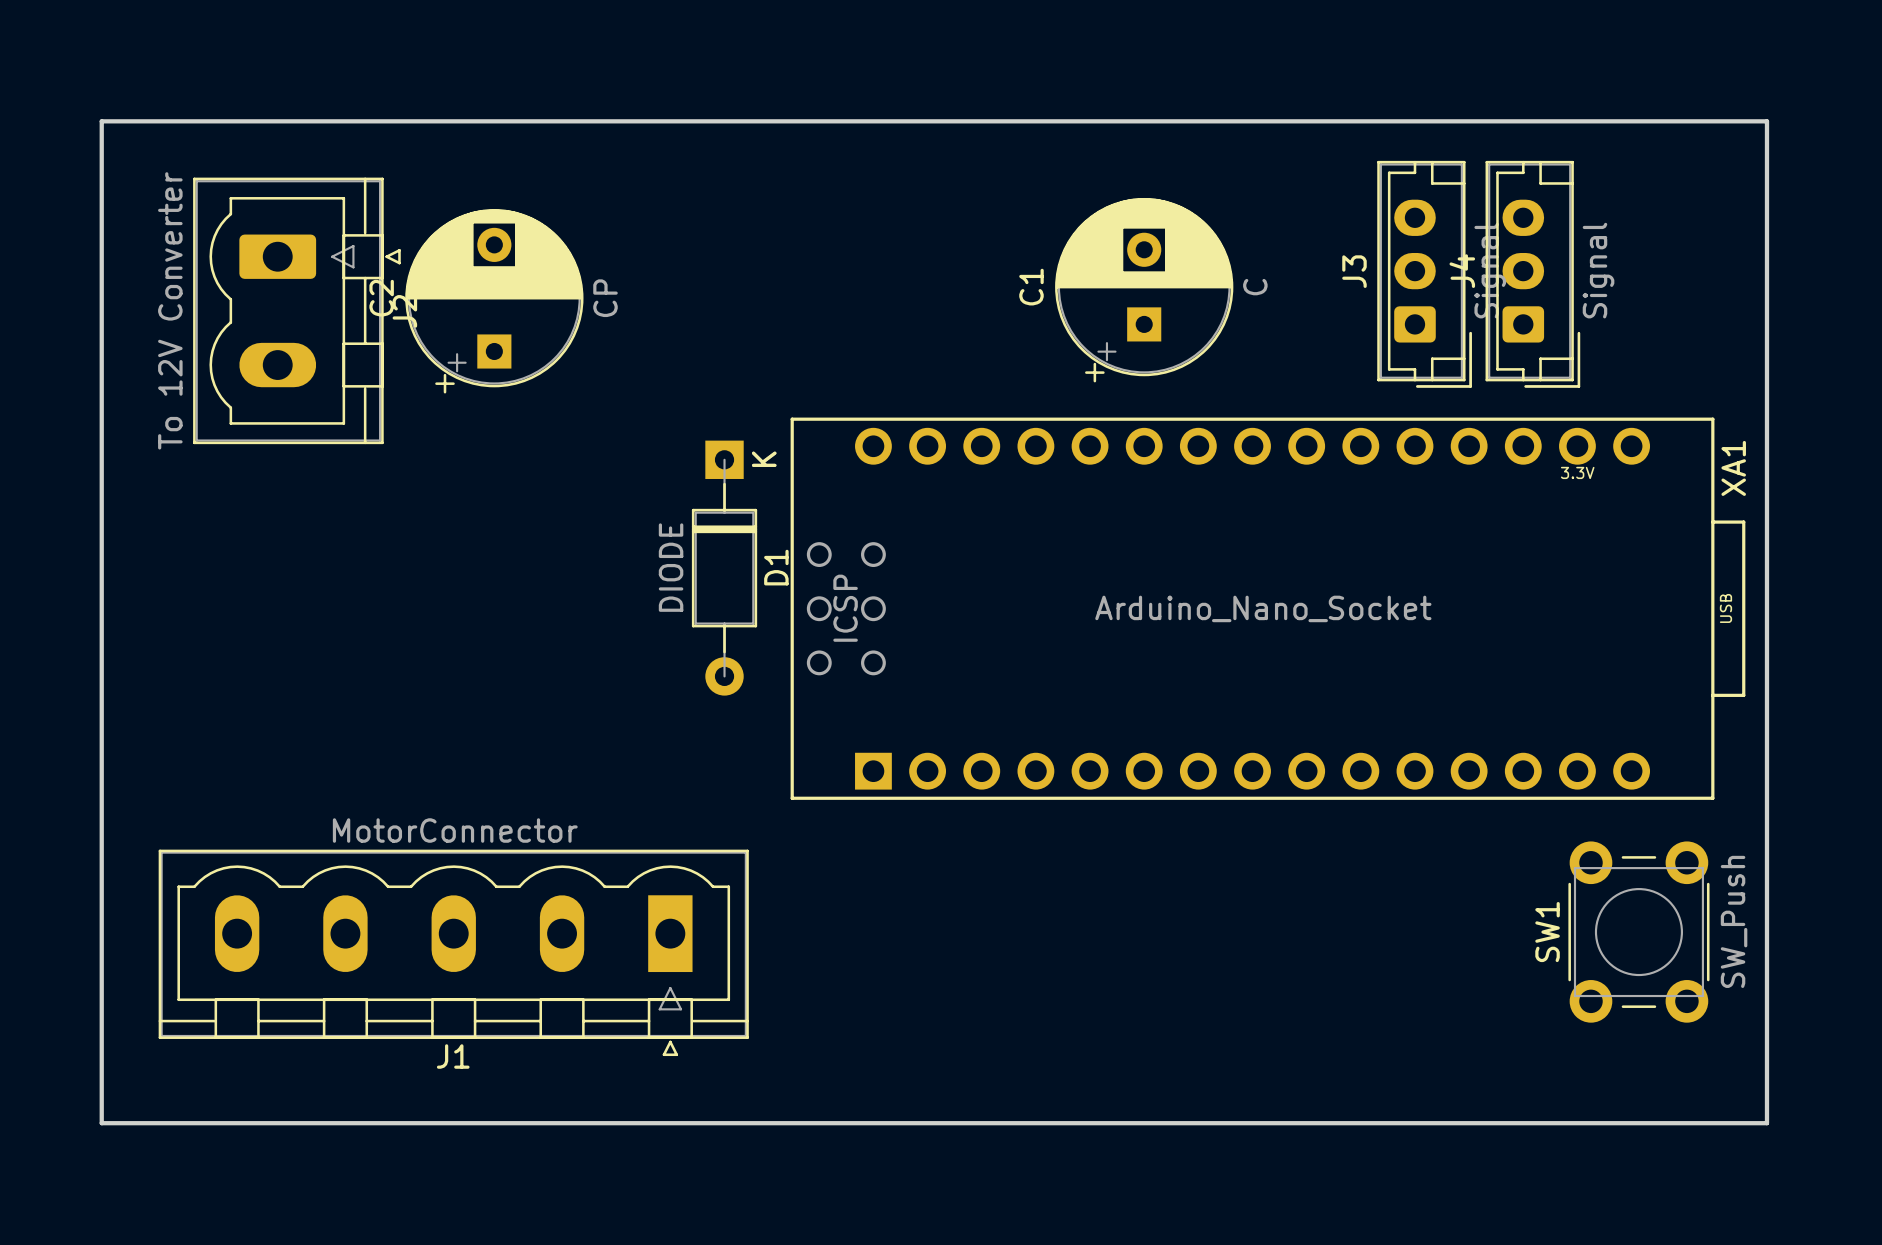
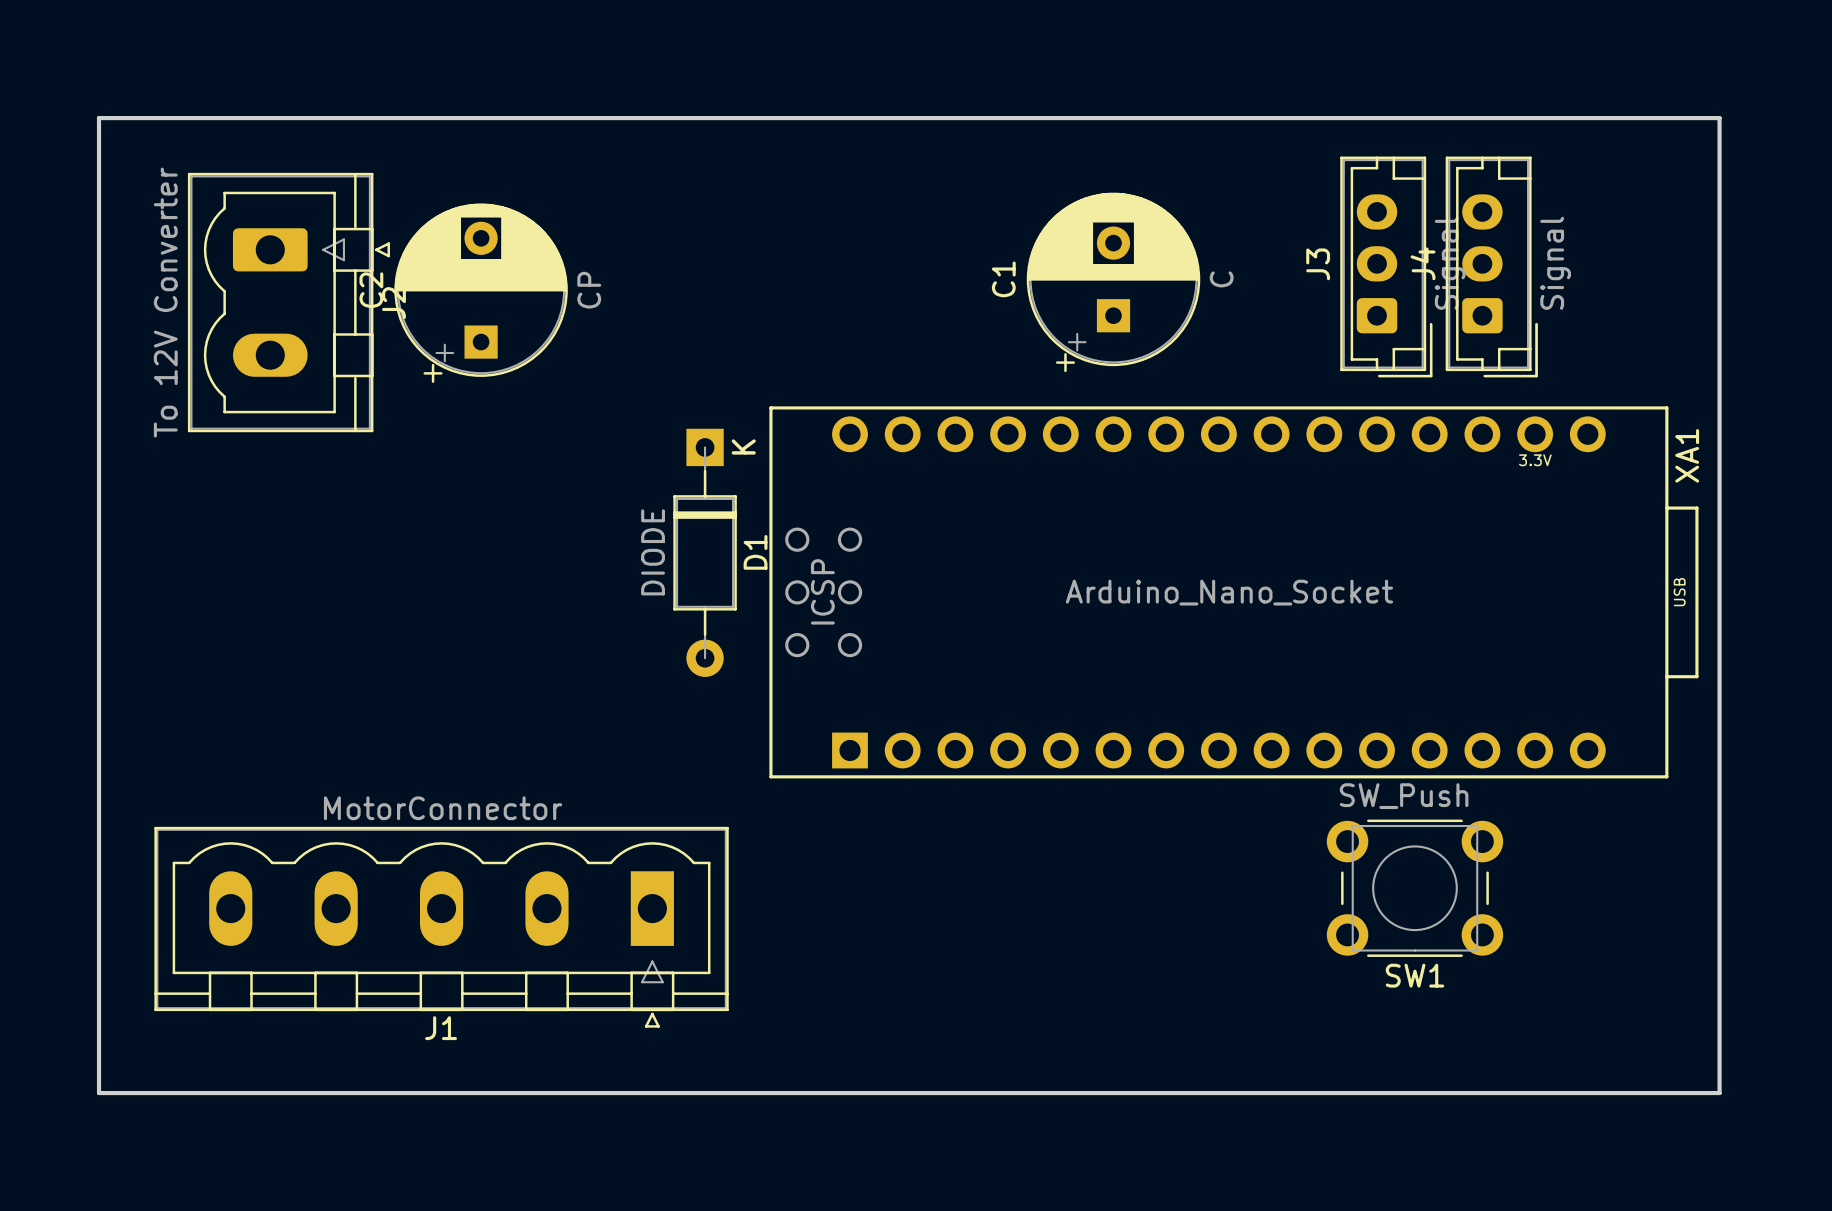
SW1 rotation: 0° (1638, 932) -> 90° counterclockwise (1414, 888)
SW1 position: (1638, 932) -> (1414, 888)

